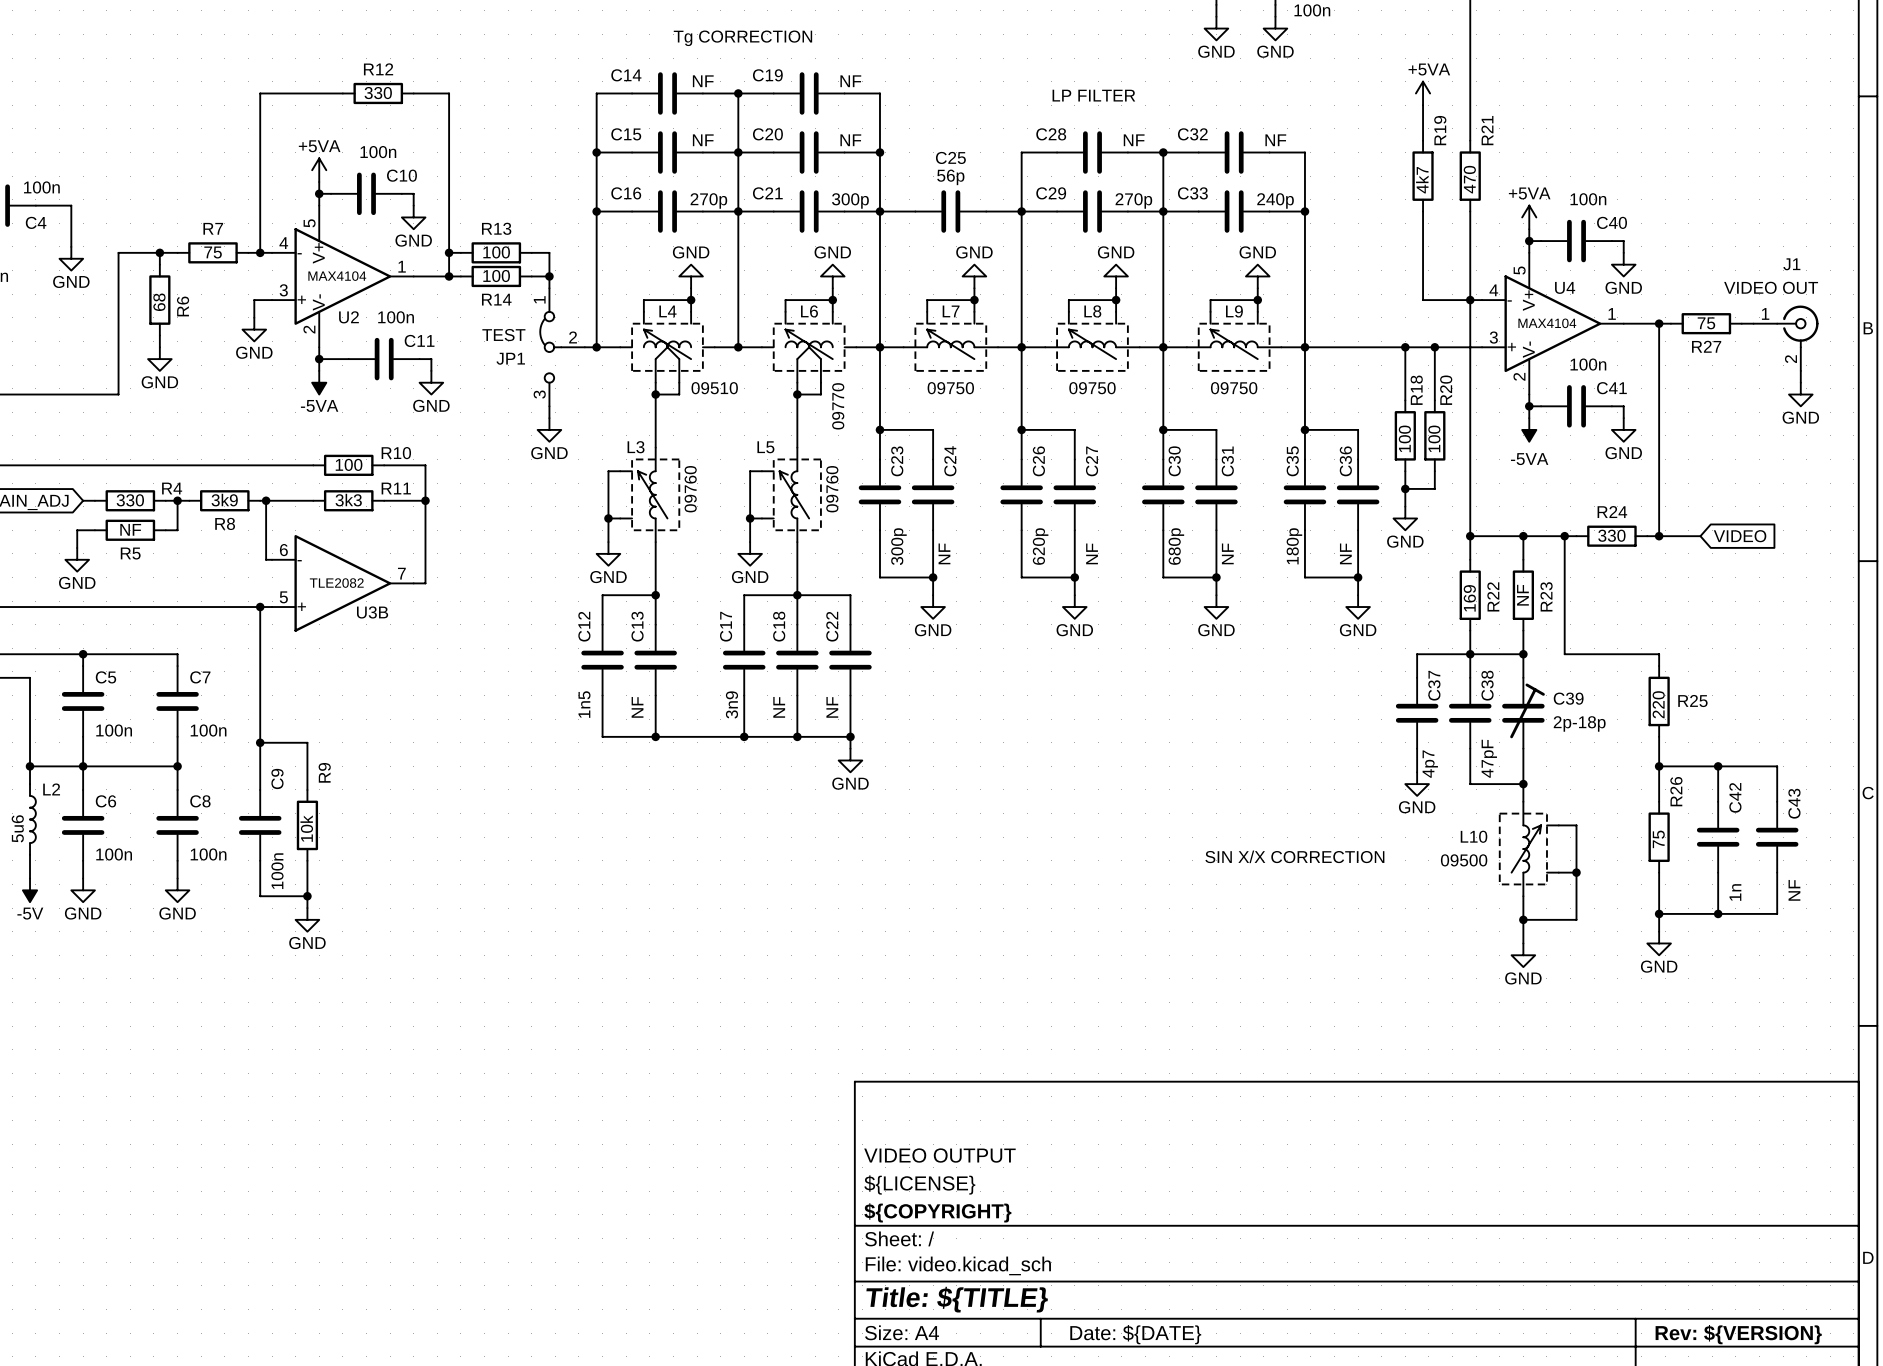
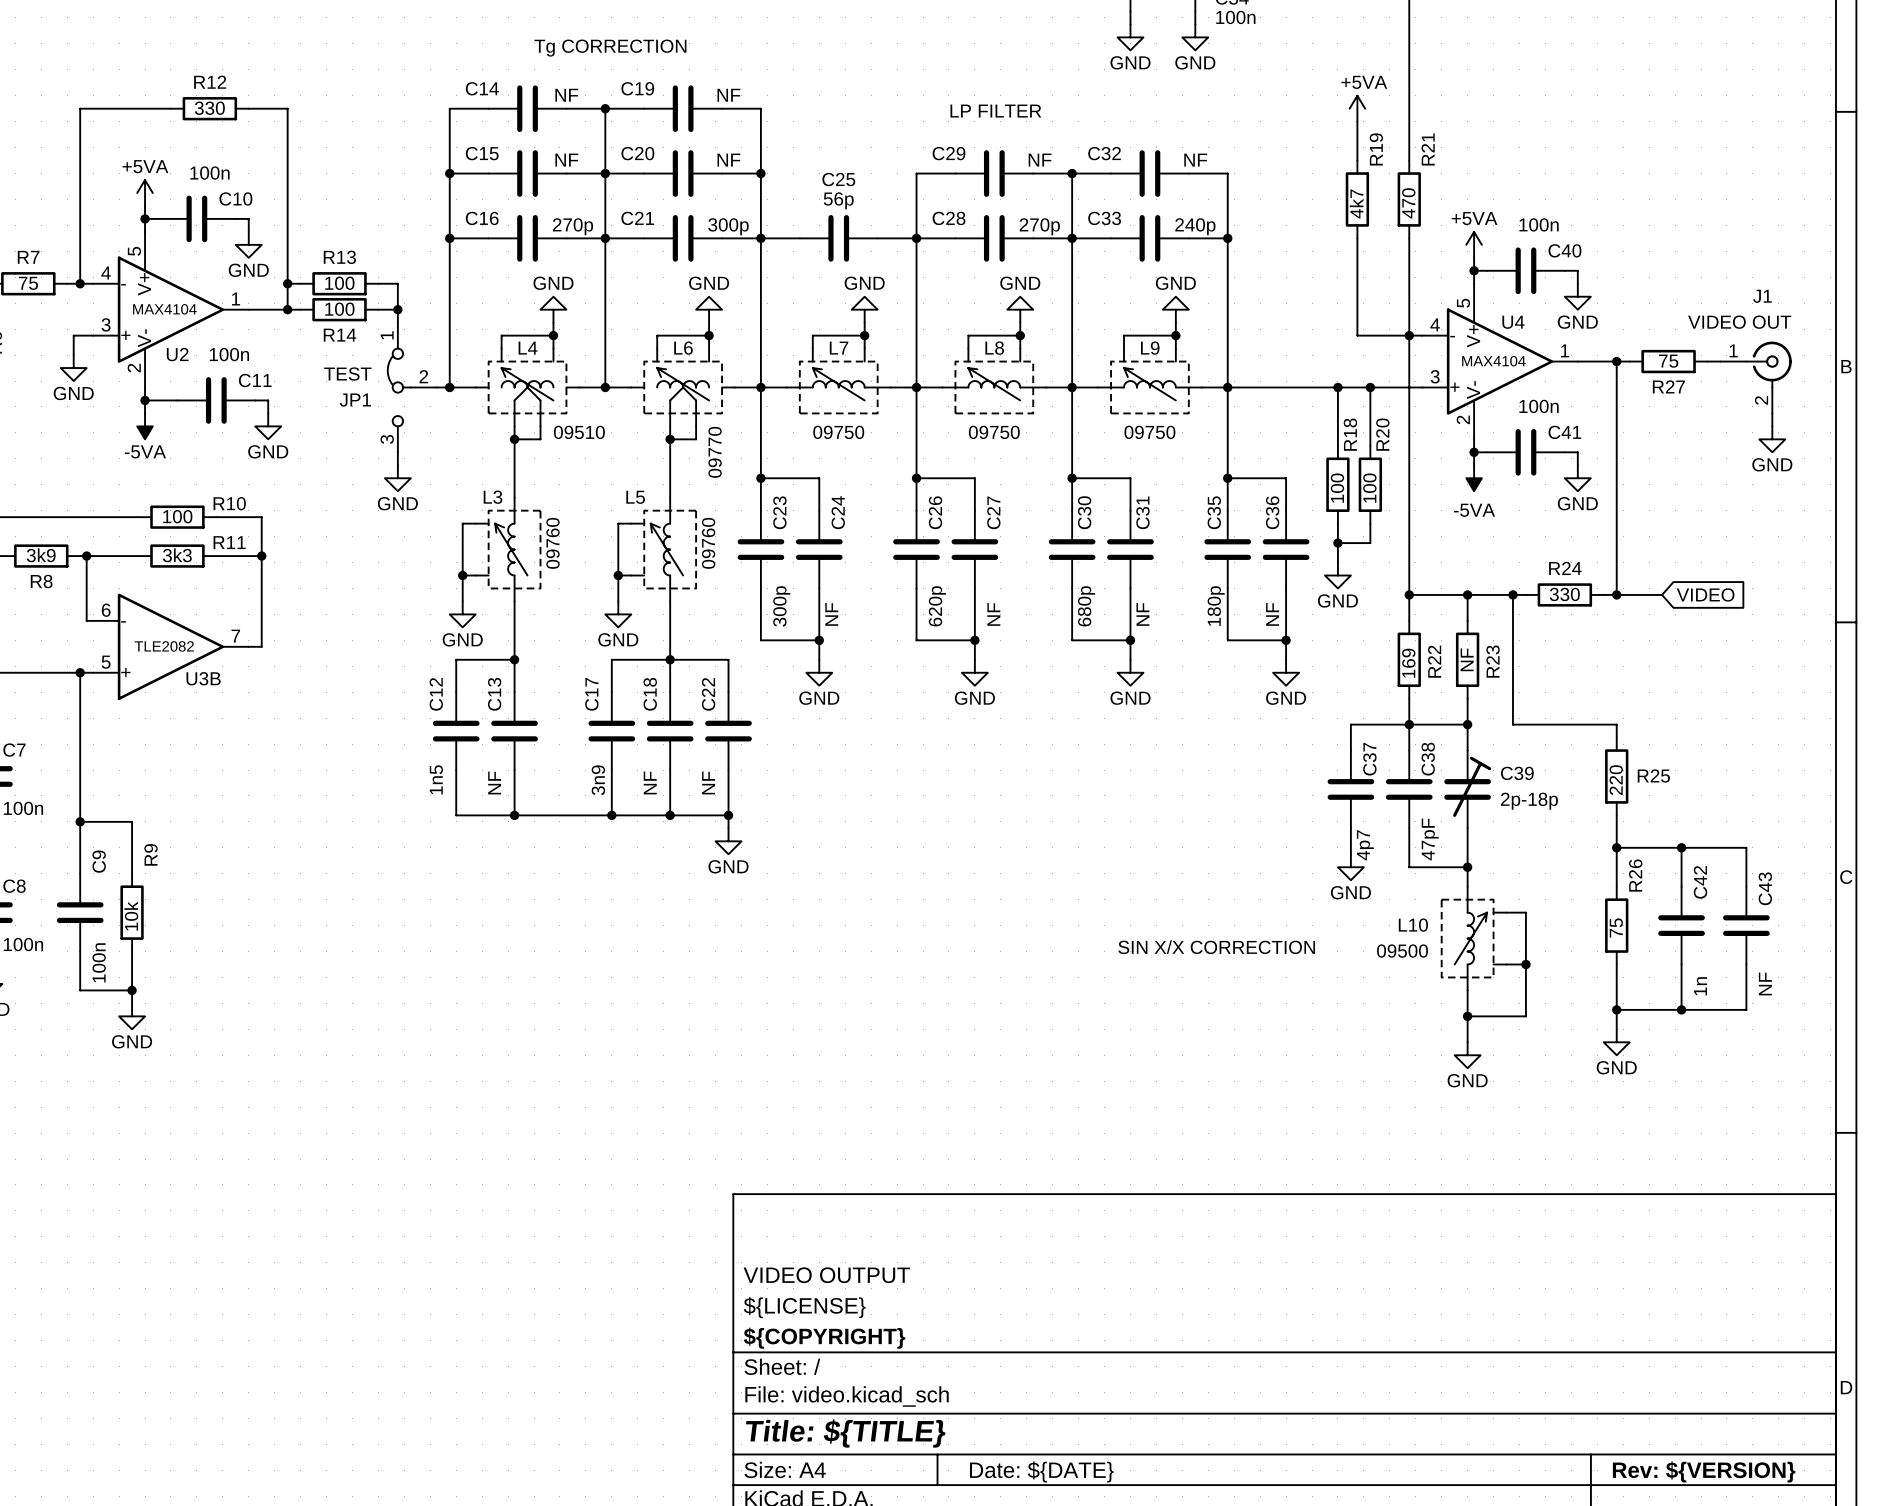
C28 name: C28 (1051, 134) -> C29 (948, 153)
C29 name: C29 (1051, 193) -> C28 (949, 218)

